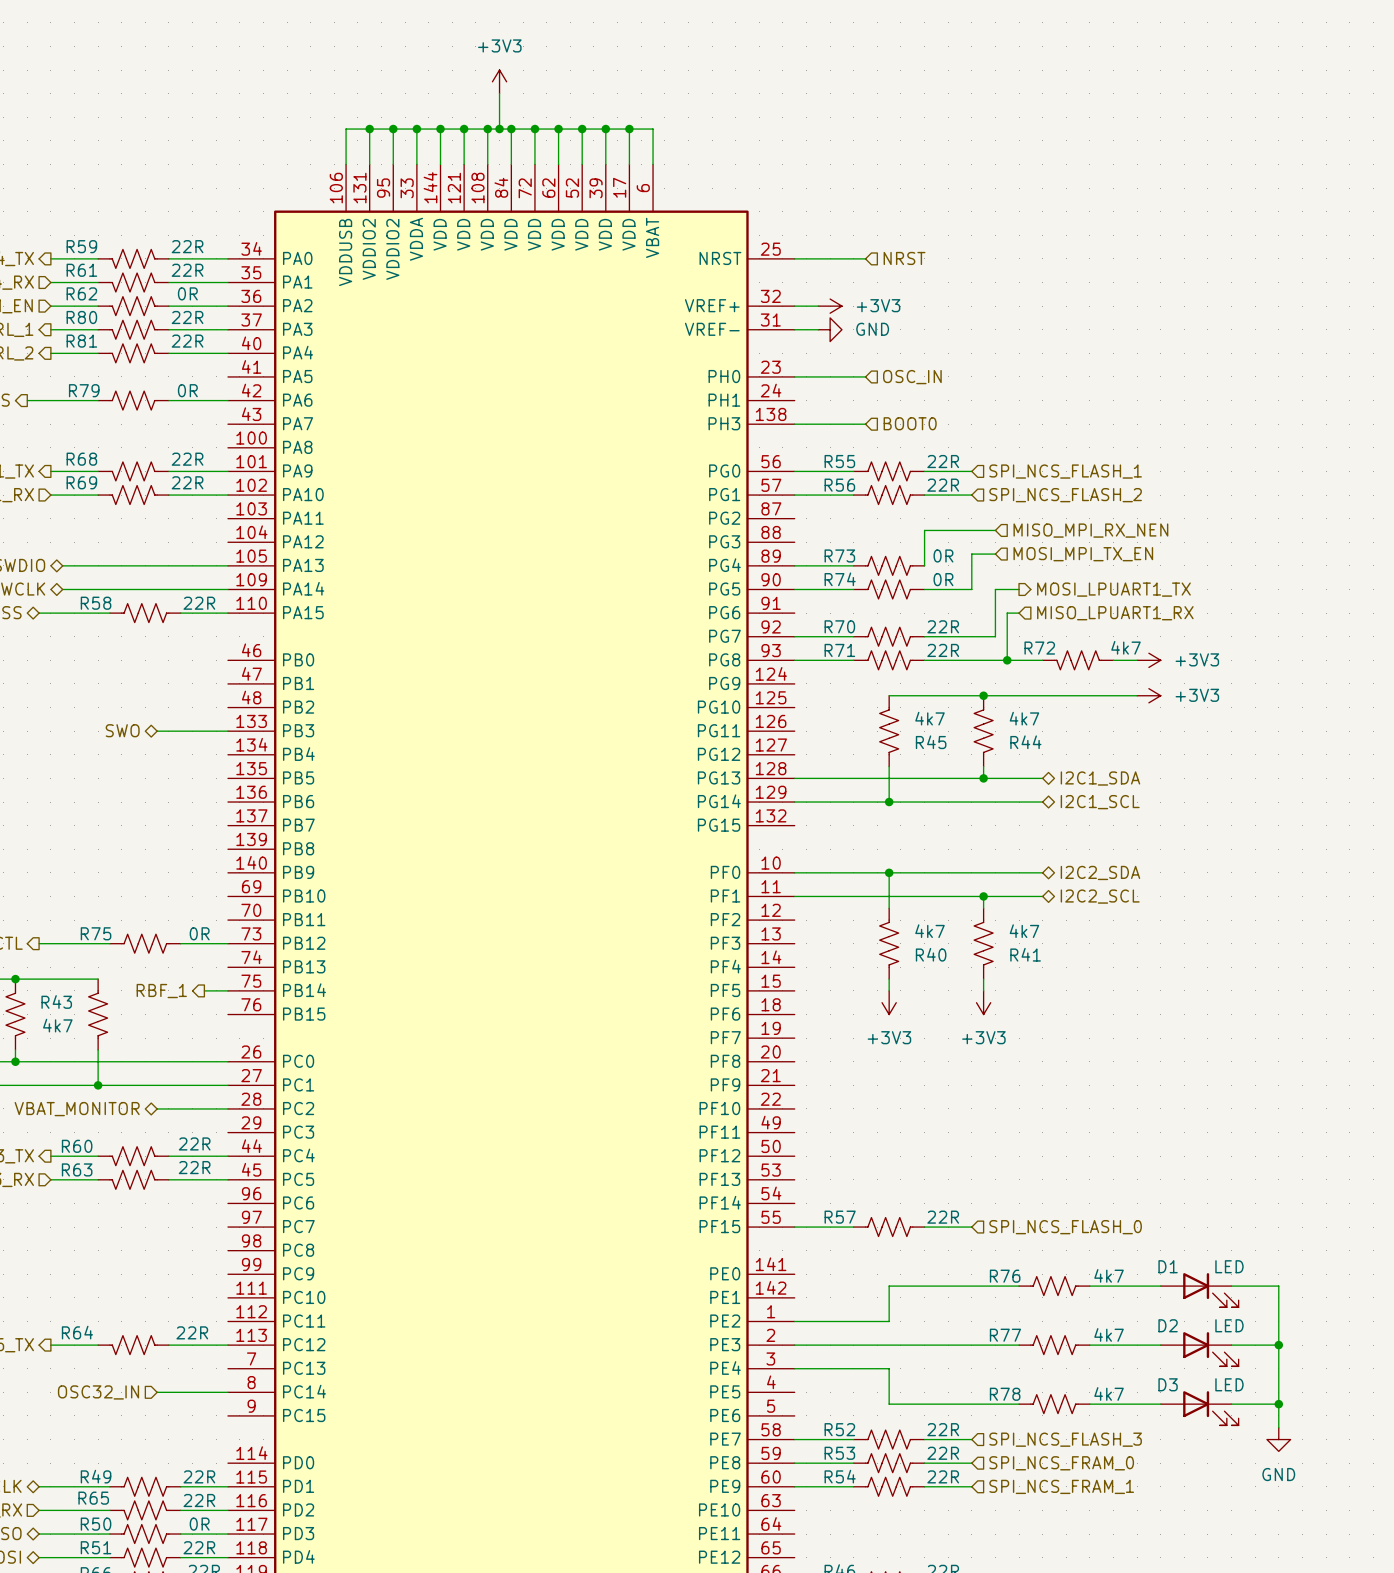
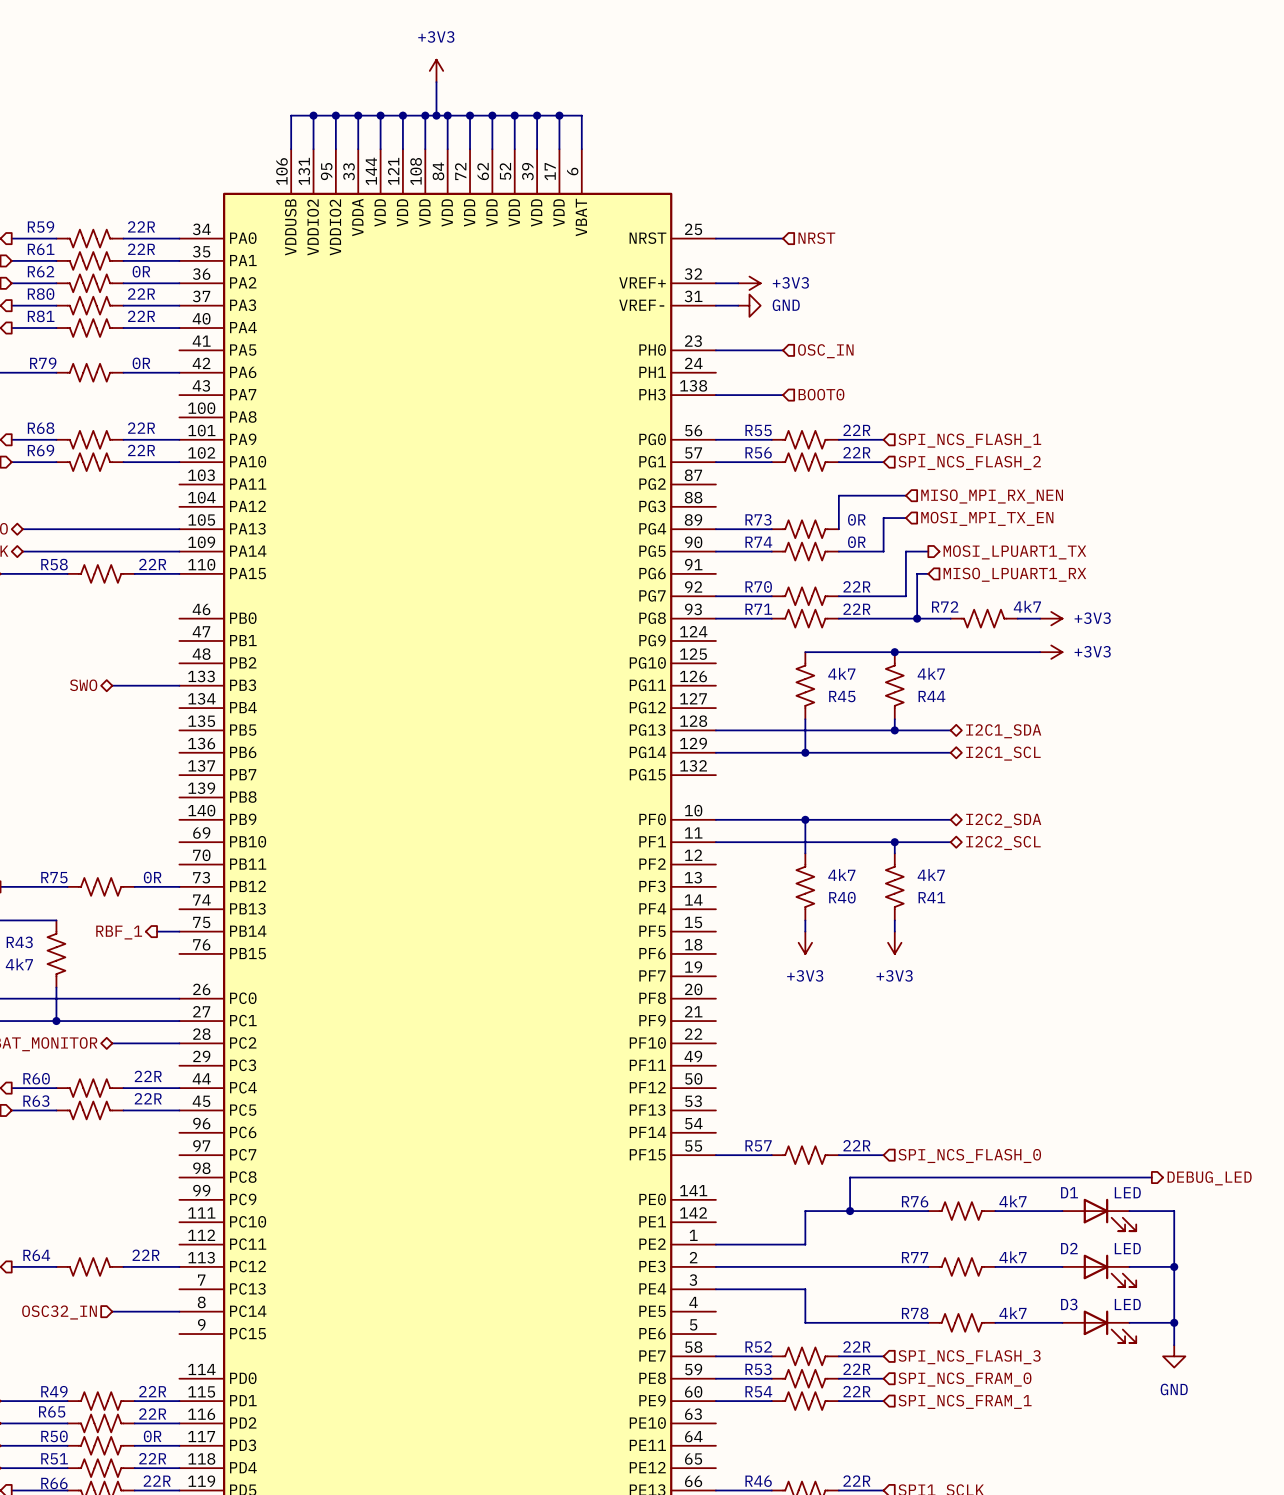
wire: none -> (1151, 1177) (850, 1177) (850, 1211)
hierarchical label: none -> DEBUG_LED (1209, 1178)
junction: none -> (850, 1211)

